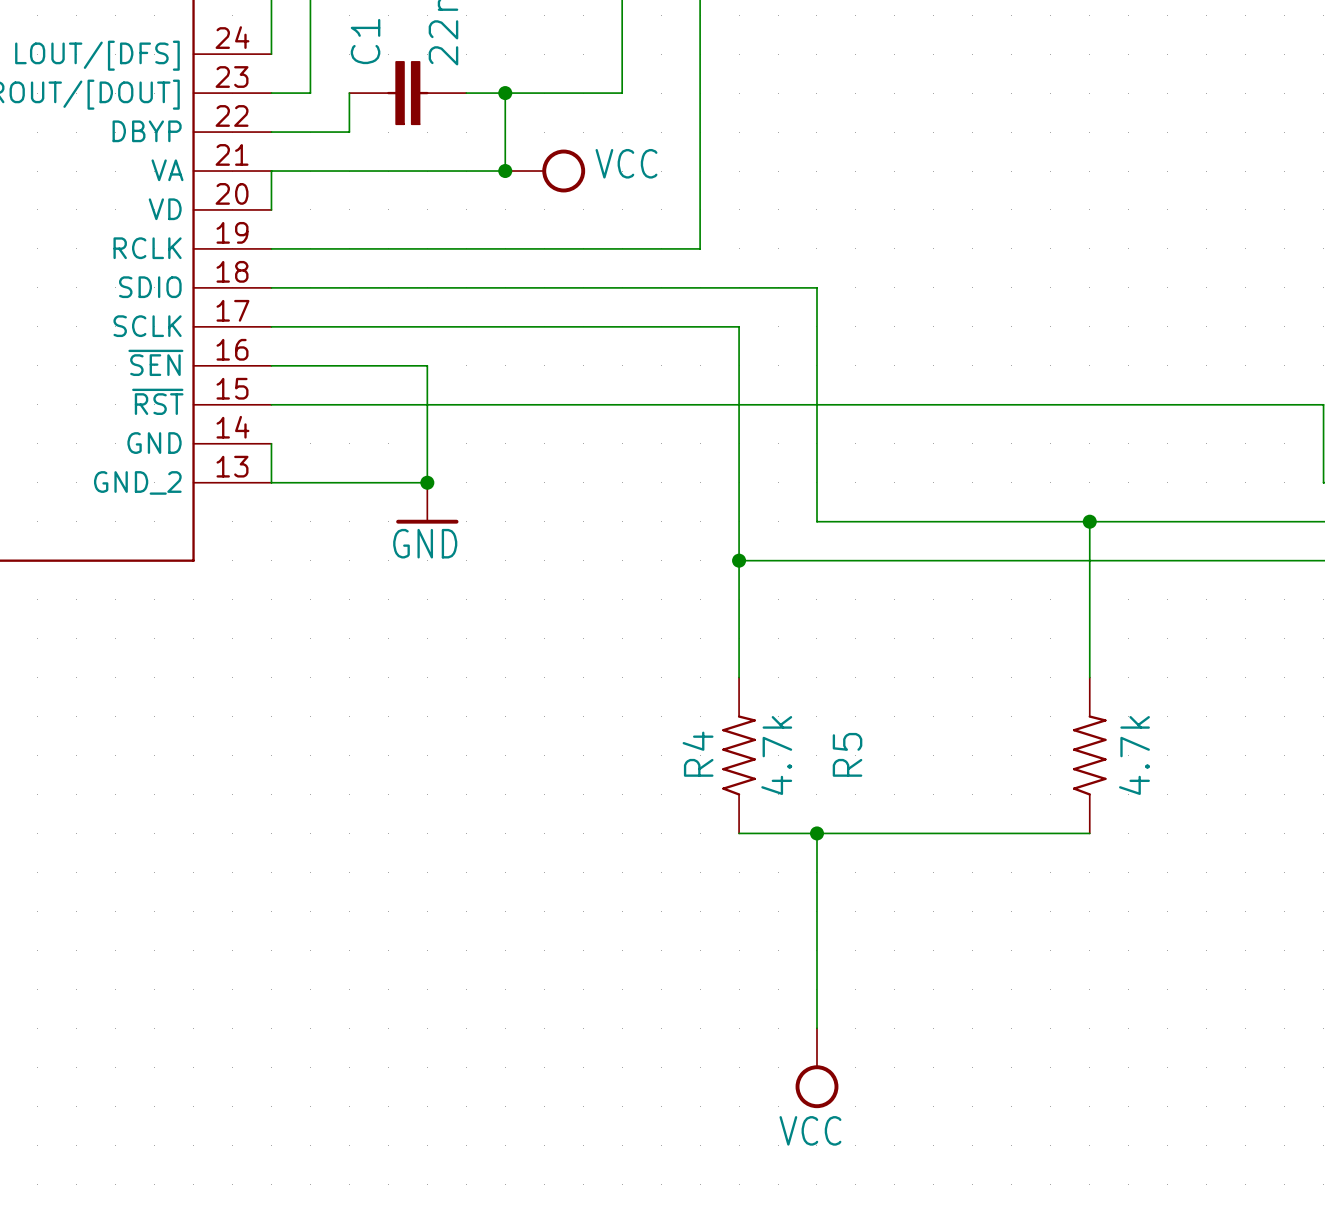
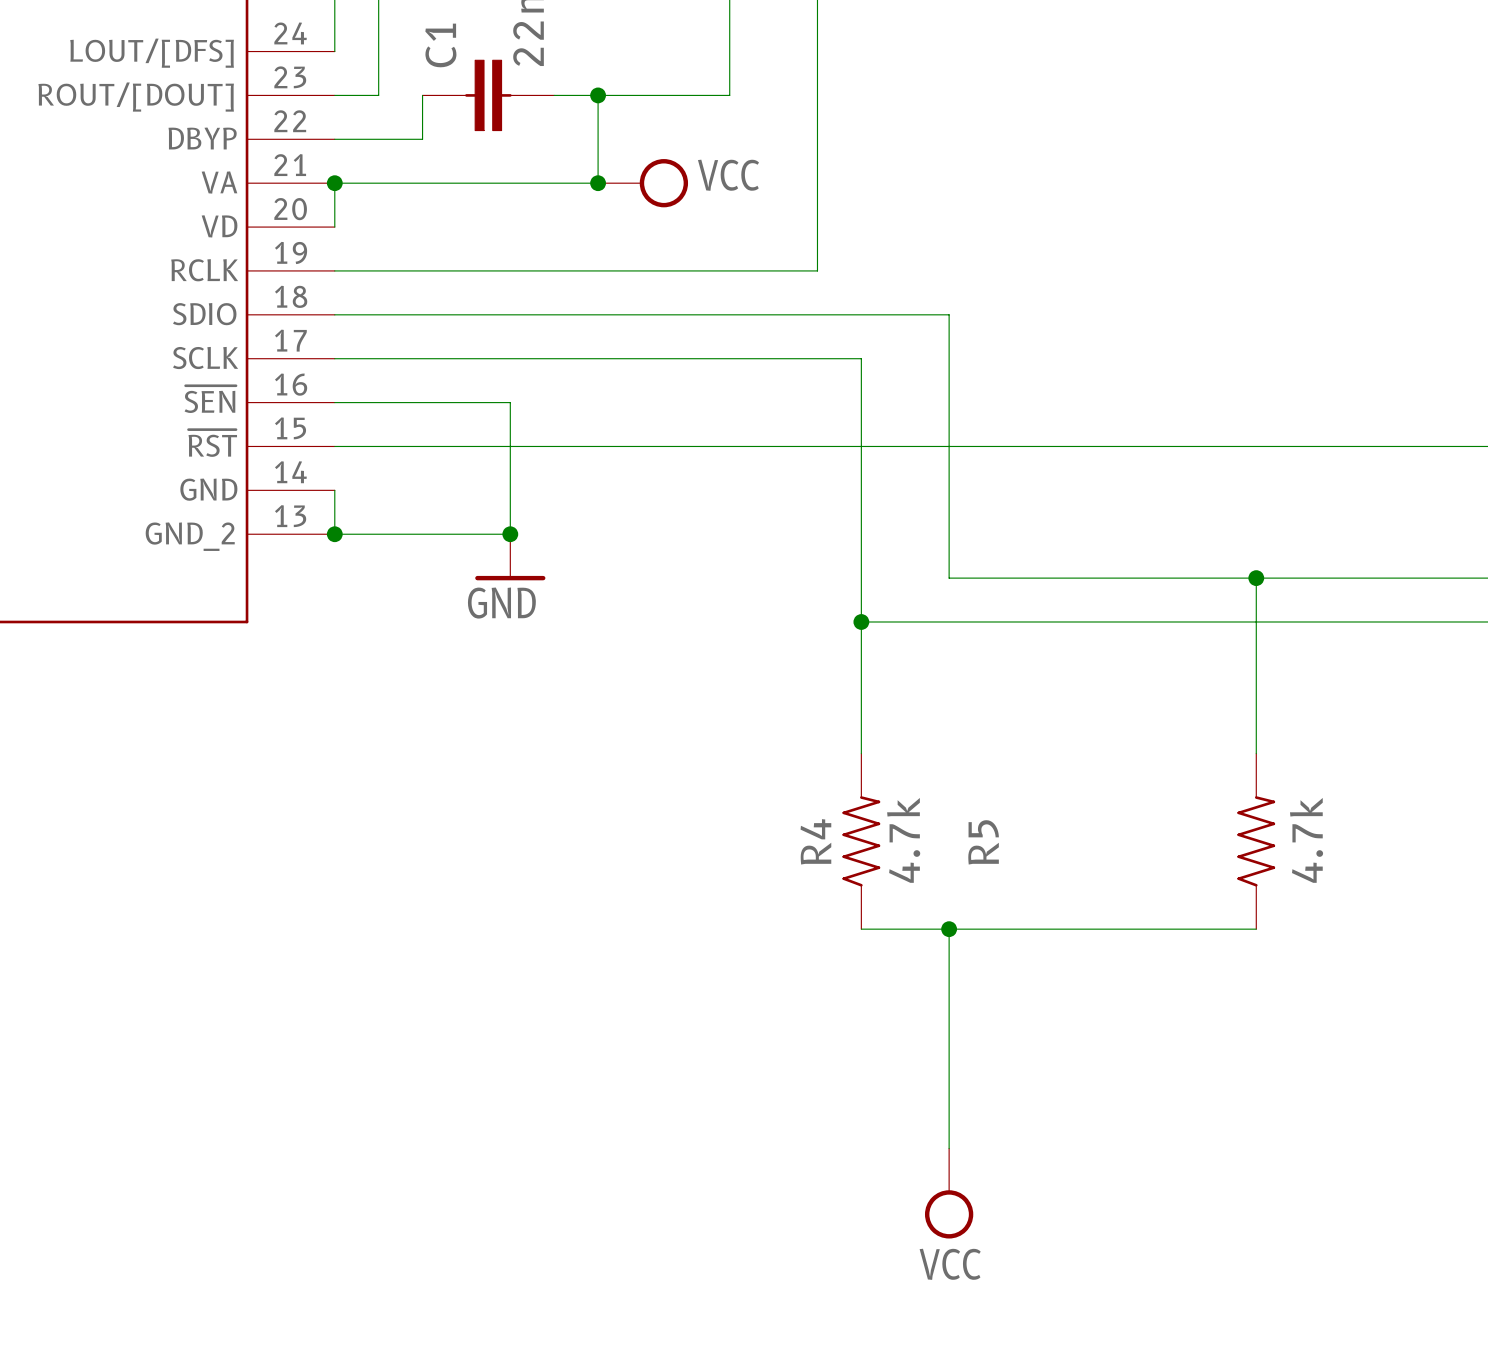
junction: none -> (334, 183)
junction: none -> (334, 534)

